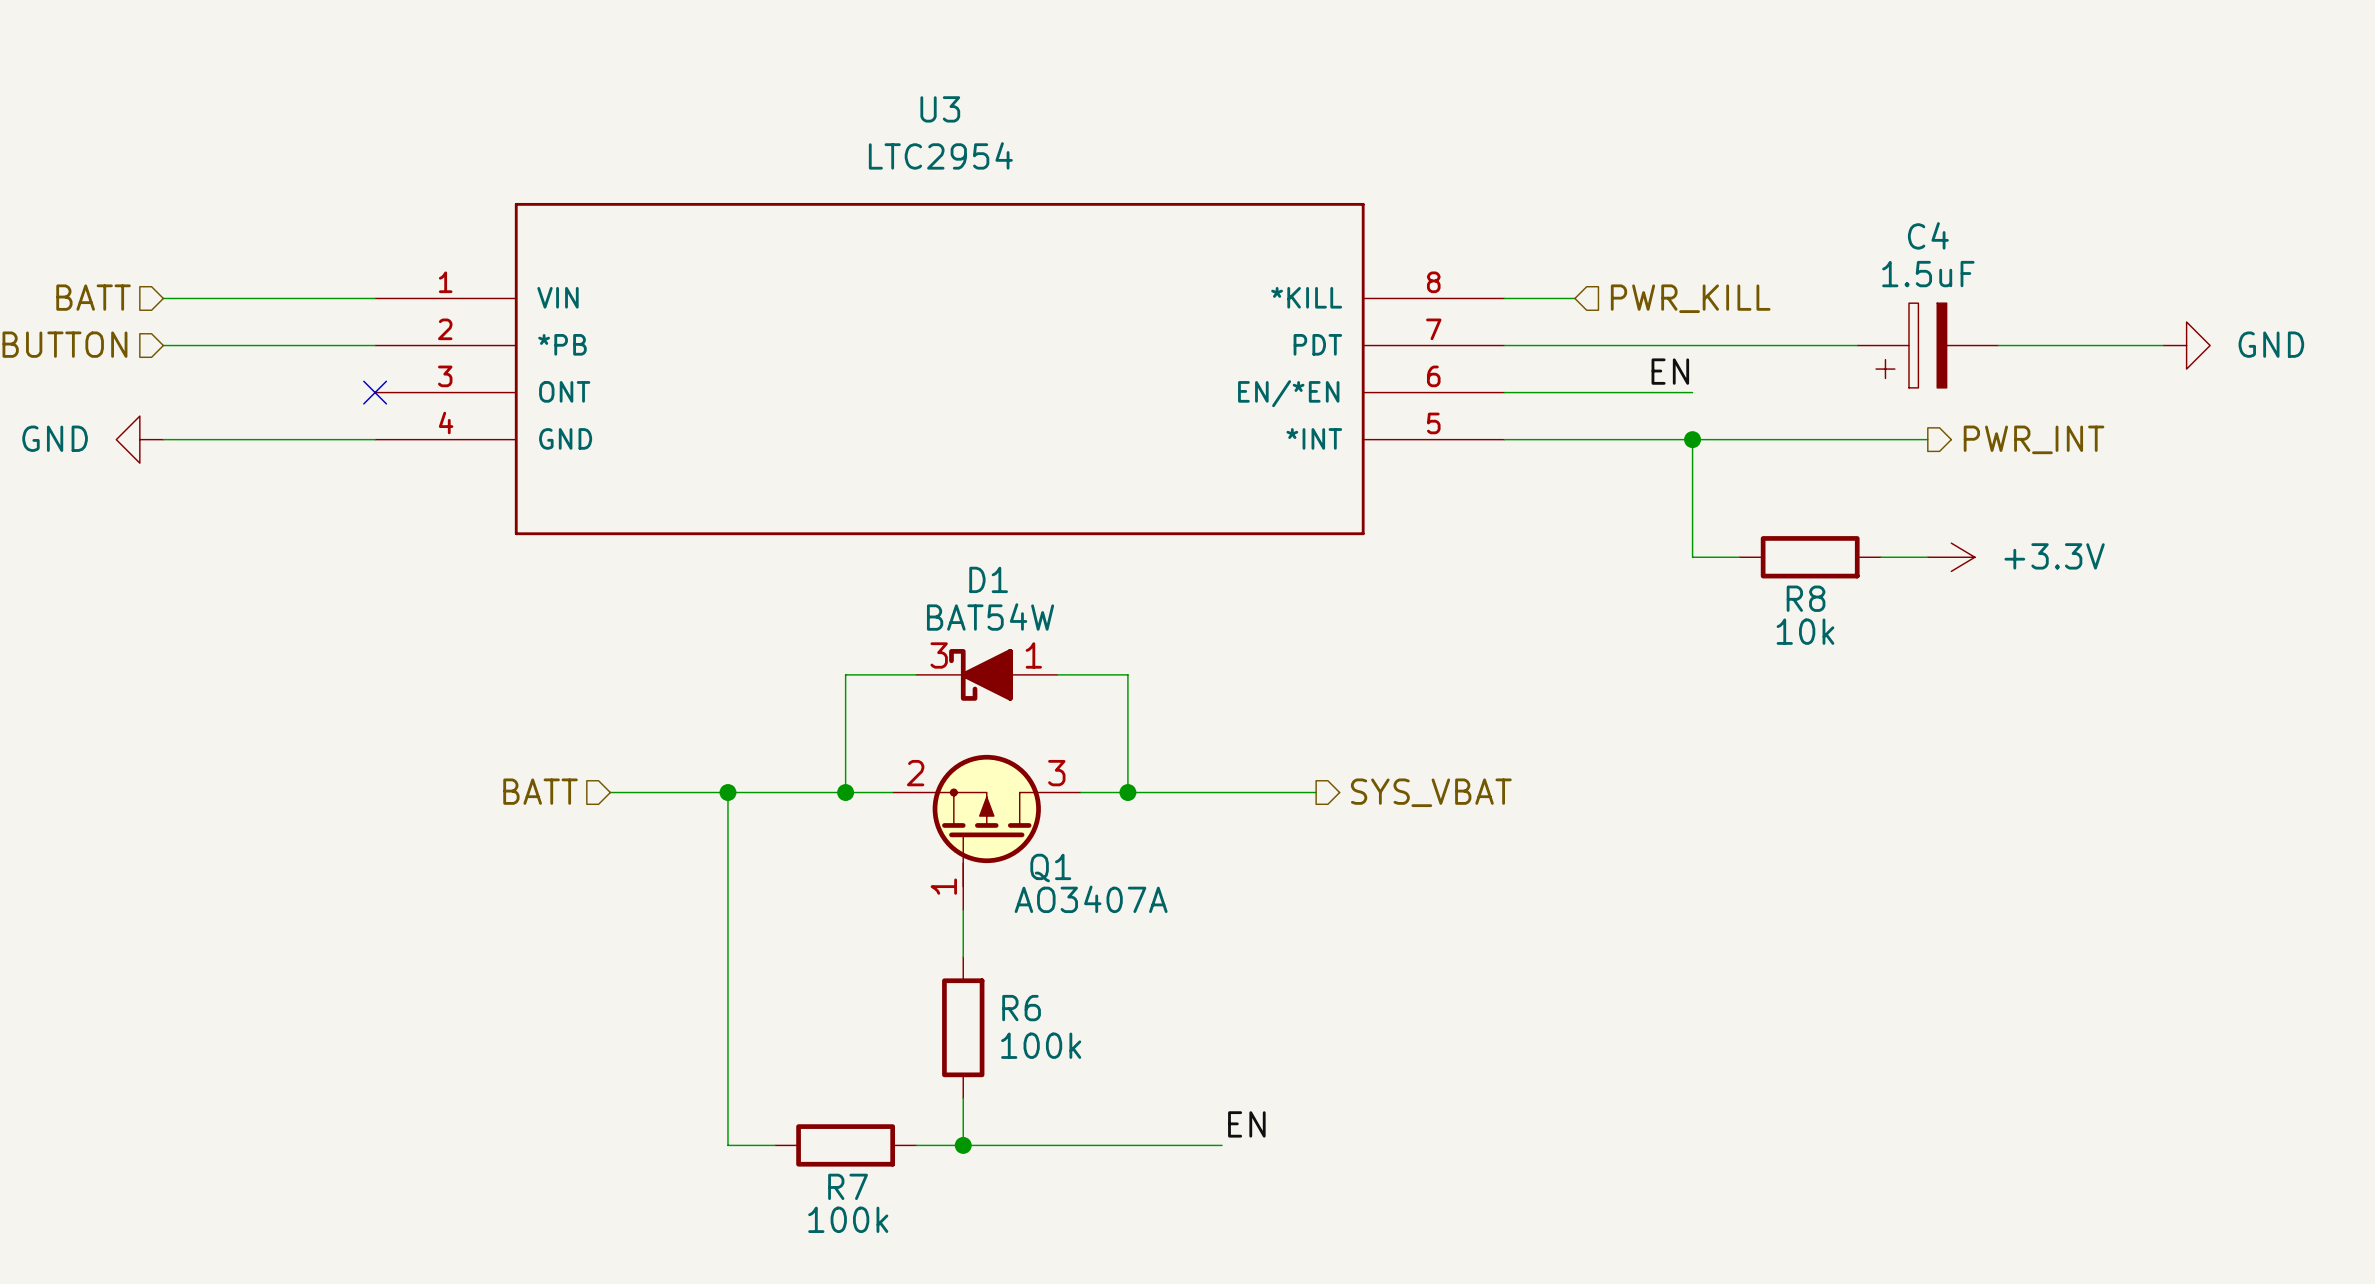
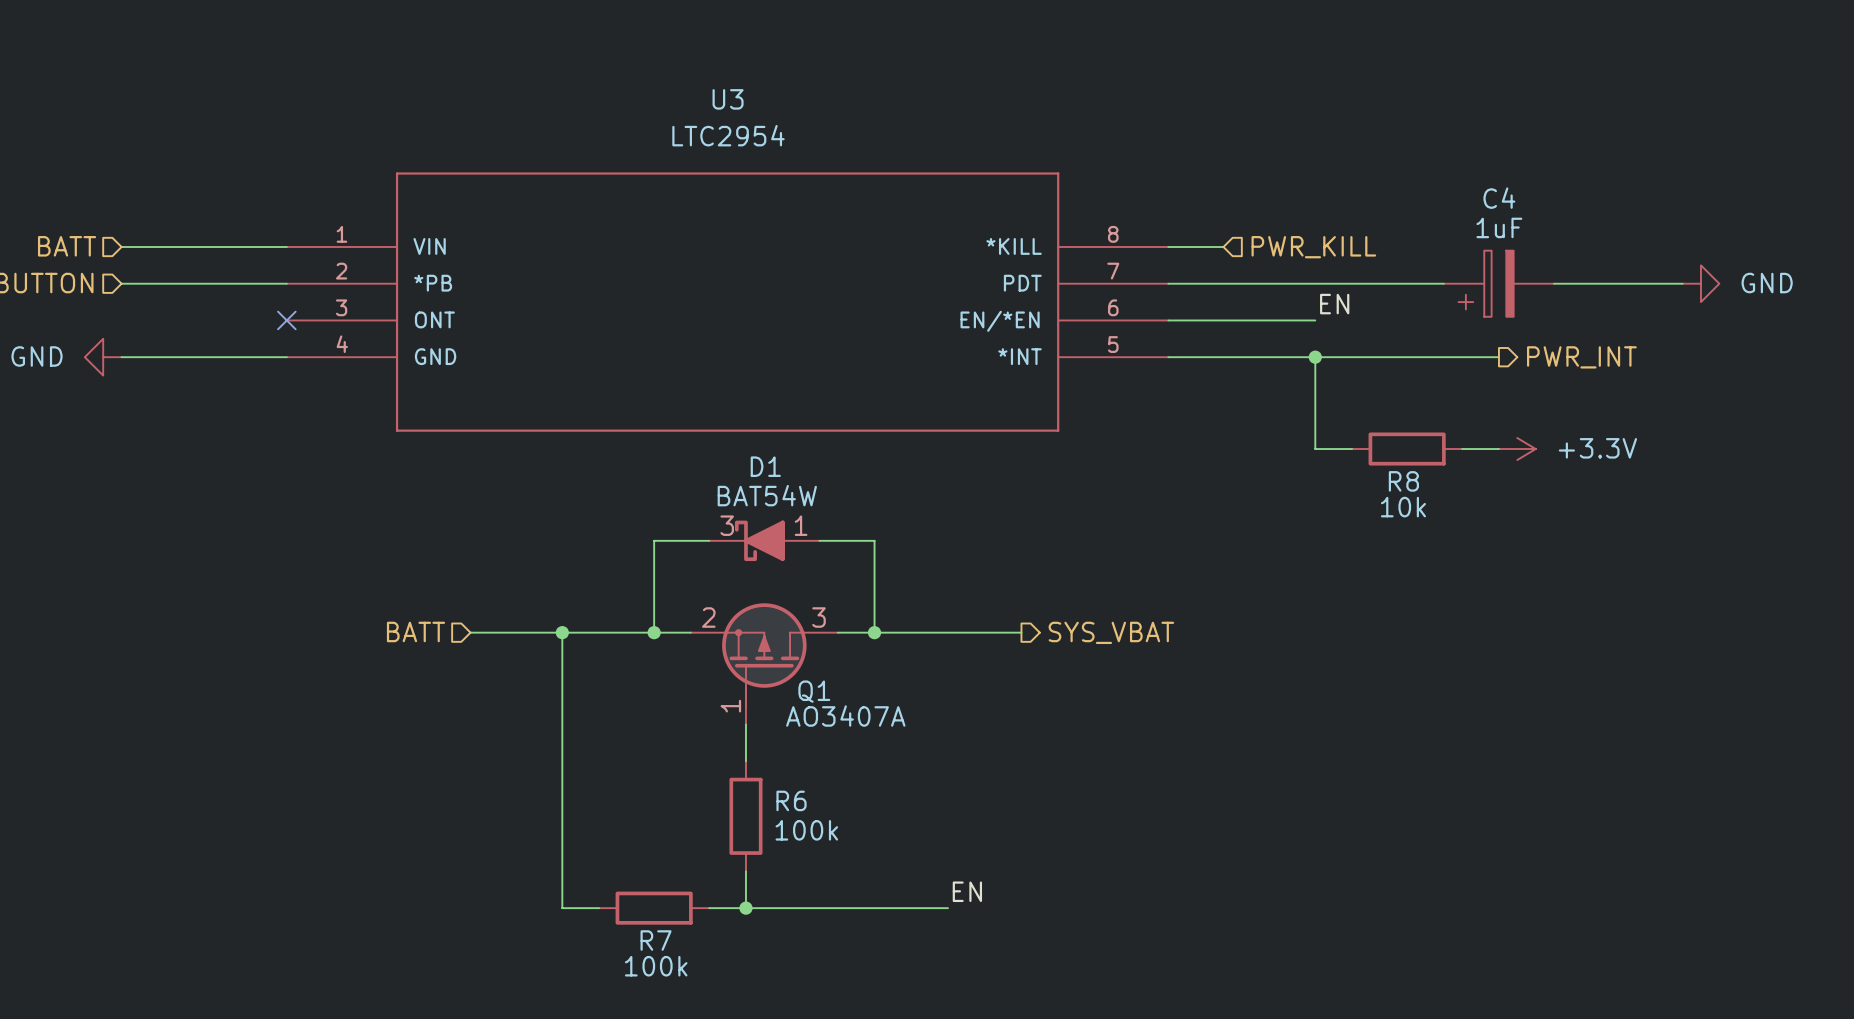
C4 value: 1.5uF (1928, 274) -> 1uF (1499, 227)
label position: EN (1670, 371) -> EN (1334, 304)

